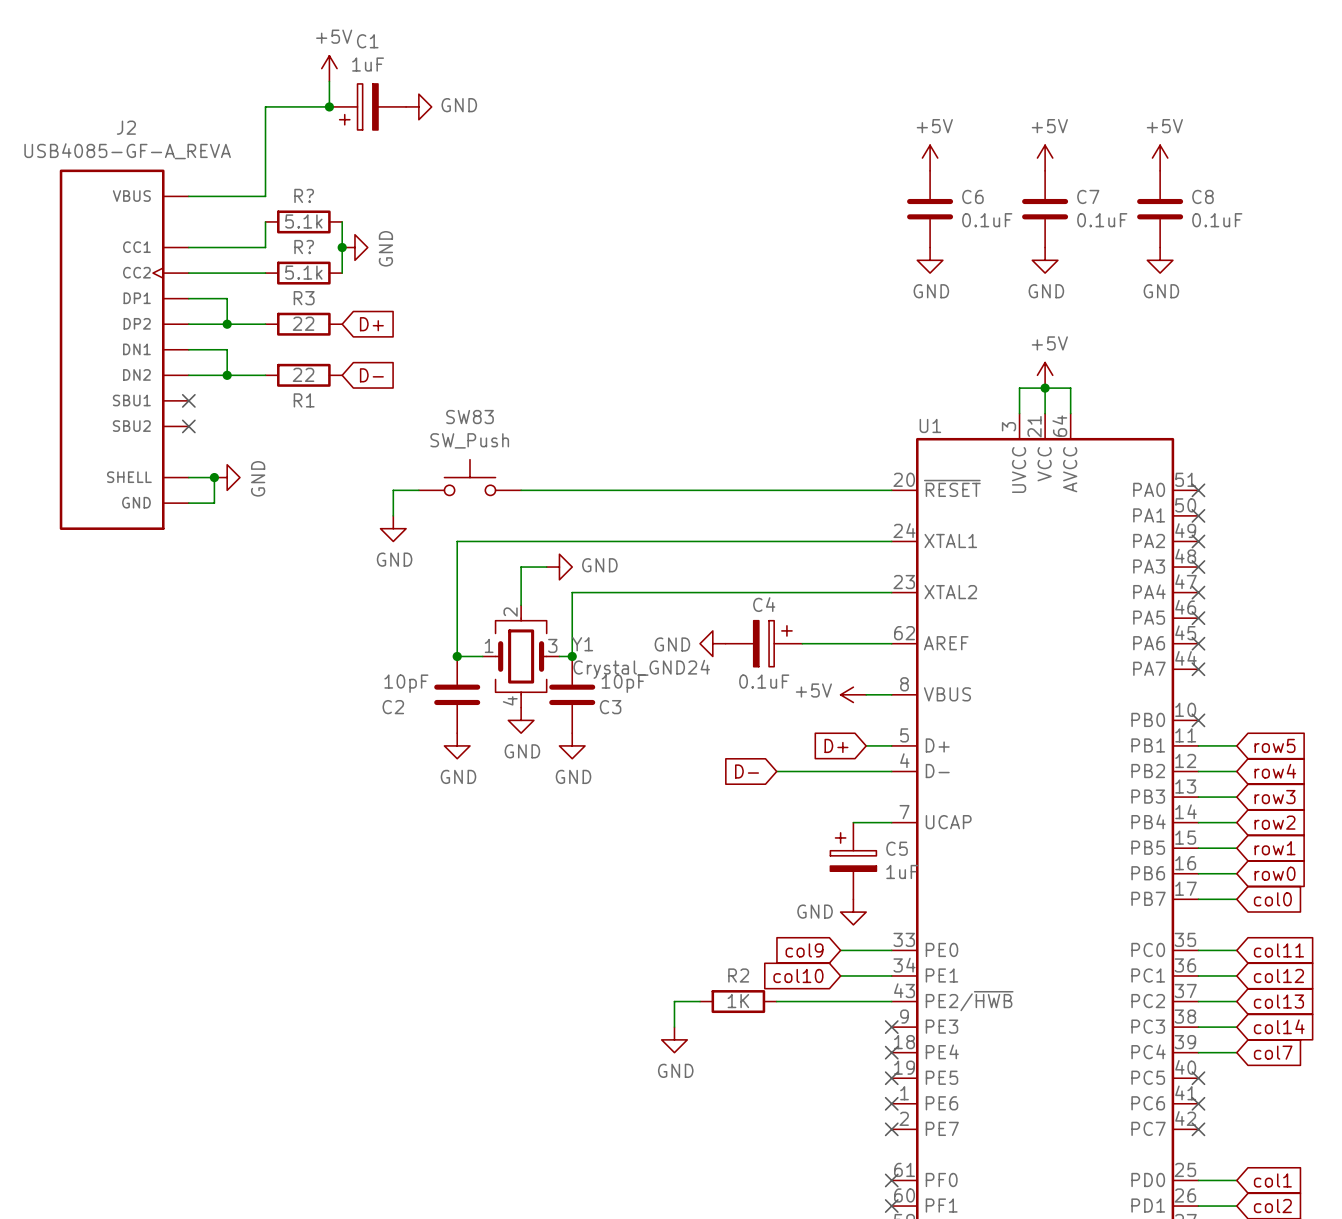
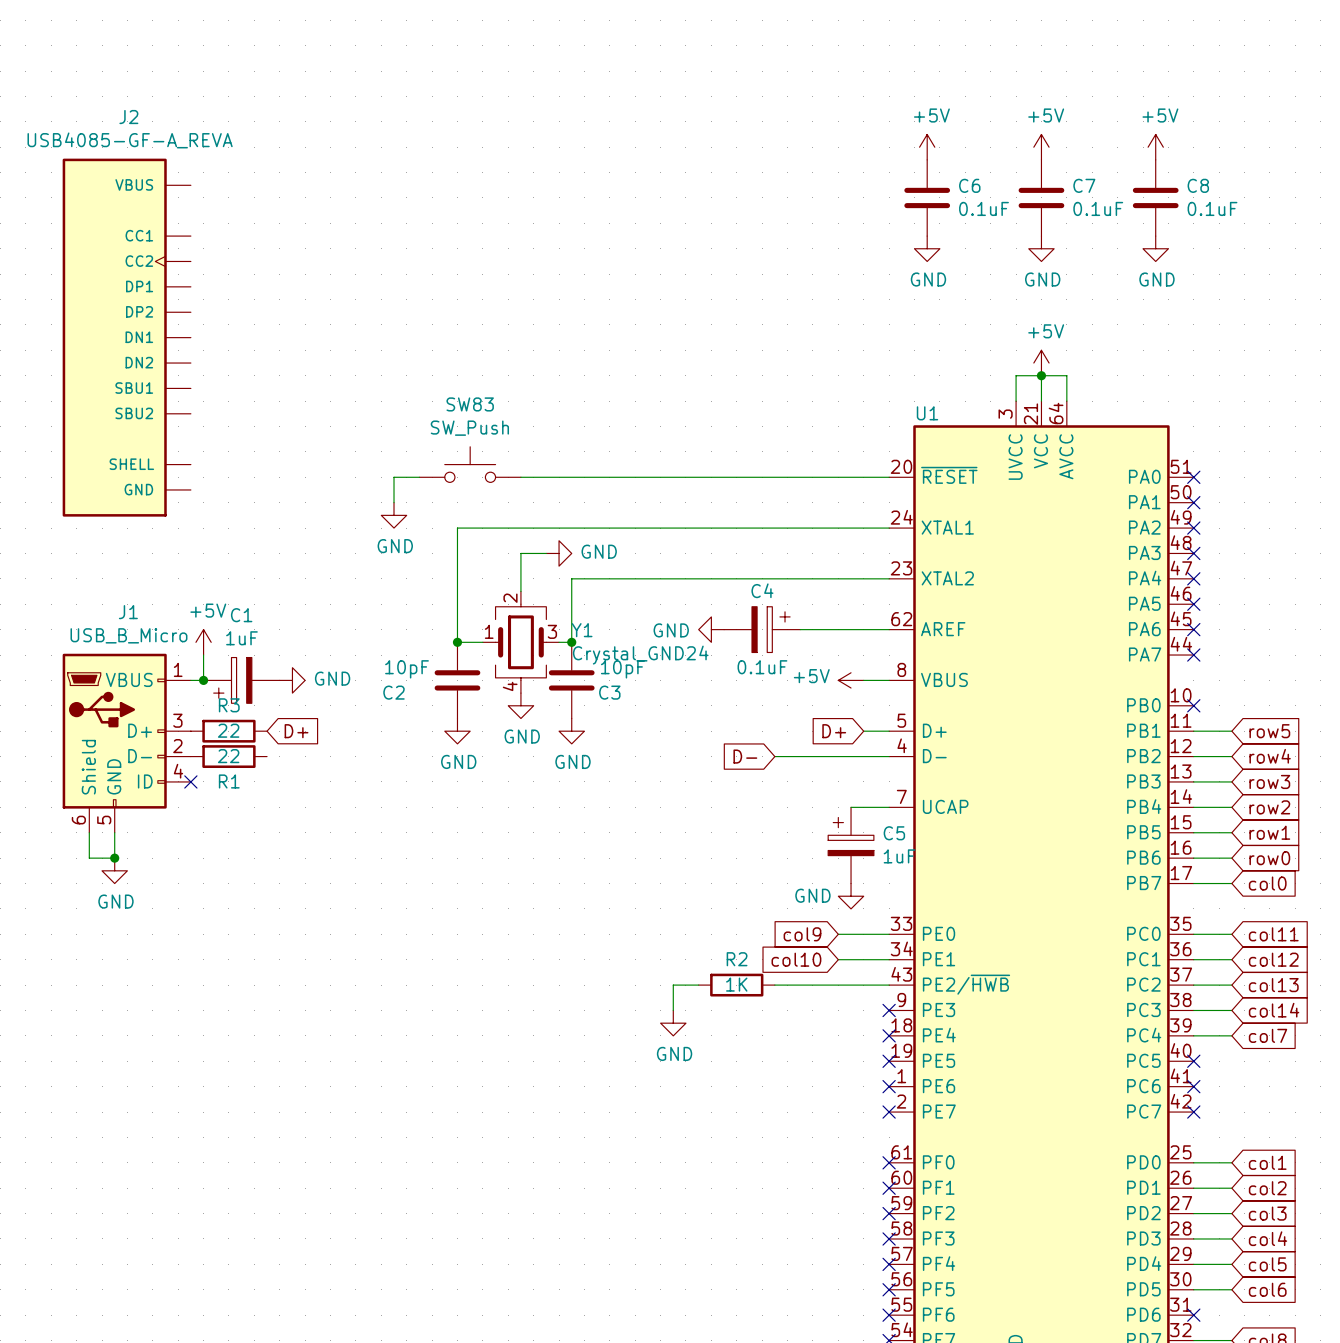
power symbol: +5V (329, 68) -> none
wire: (329, 81) (329, 106) (265, 106) (265, 196) (188, 196) -> none
junction: (329, 106) -> none
C1 position: (367, 106) -> (241, 680)
power symbol: GND (418, 106) -> none
wire: (265, 221) (265, 247) (188, 247) -> none
R?: 5.1k (303, 221) -> none
wire: (342, 221) (342, 273) -> none
junction: (342, 247) -> none
power symbol: GND (354, 247) -> none
wire: (188, 273) (265, 273) -> none
R?: 5.1k (303, 273) -> none
wire: (188, 298) (227, 298) (227, 324) -> none
wire: (188, 324) (265, 324) -> none
junction: (227, 324) -> none
R3 position: (303, 324) -> (228, 731)
global label: D+ (371, 324) -> none
wire: (188, 349) (227, 349) (227, 375) -> none
wire: (188, 375) (265, 375) -> none
junction: (227, 375) -> none
R1 position: (303, 375) -> (228, 756)
global label: D- (371, 375) -> none
no-connect mark: (188, 400) -> none
no-connect mark: (188, 426) -> none
wire: (188, 477) (214, 477) (214, 503) (188, 503) -> none
junction: (214, 477) -> none
power symbol: GND (227, 477) -> none
power symbol: none -> +5V (203, 642)
wire: none -> (203, 655) (203, 680) (190, 680)
junction: none -> (203, 680)
power symbol: none -> GND (292, 680)
global label: none -> D+ (296, 731)
J1: none -> USB_B_Micro (126, 743)
no-connect mark: none -> (190, 781)
wire: none -> (89, 832) (89, 858) (114, 858) (114, 832)
junction: none -> (114, 858)
power symbol: none -> GND (114, 870)

